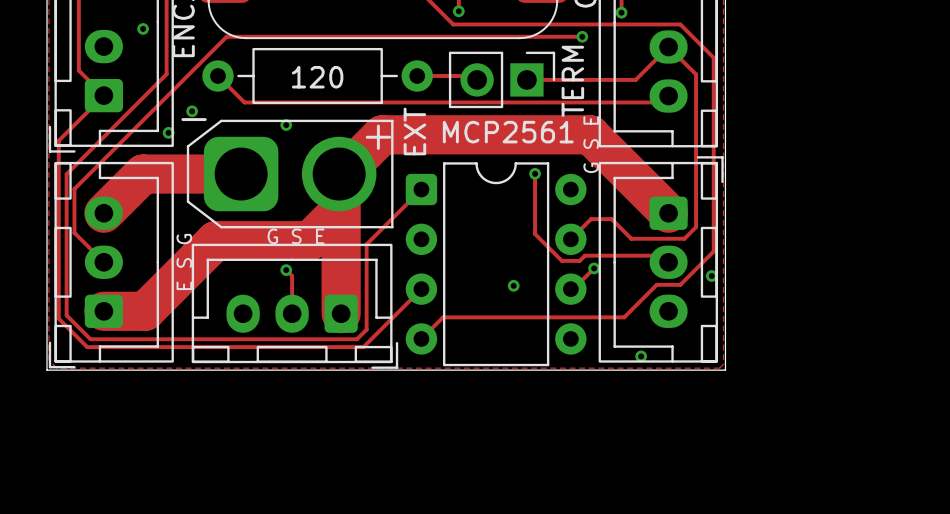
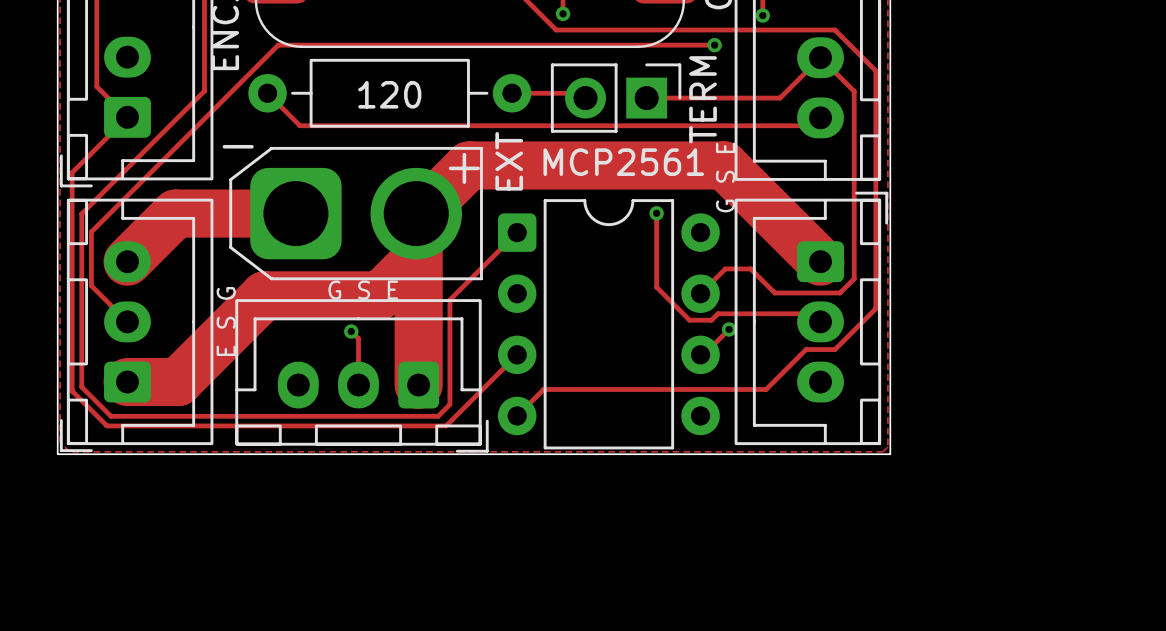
via: (143, 28) -> none
via: (192, 111) -> none
via: (286, 125) -> none
via: (168, 132) -> none
via: (711, 276) -> none
via: (513, 285) -> none
via: (641, 356) -> none

